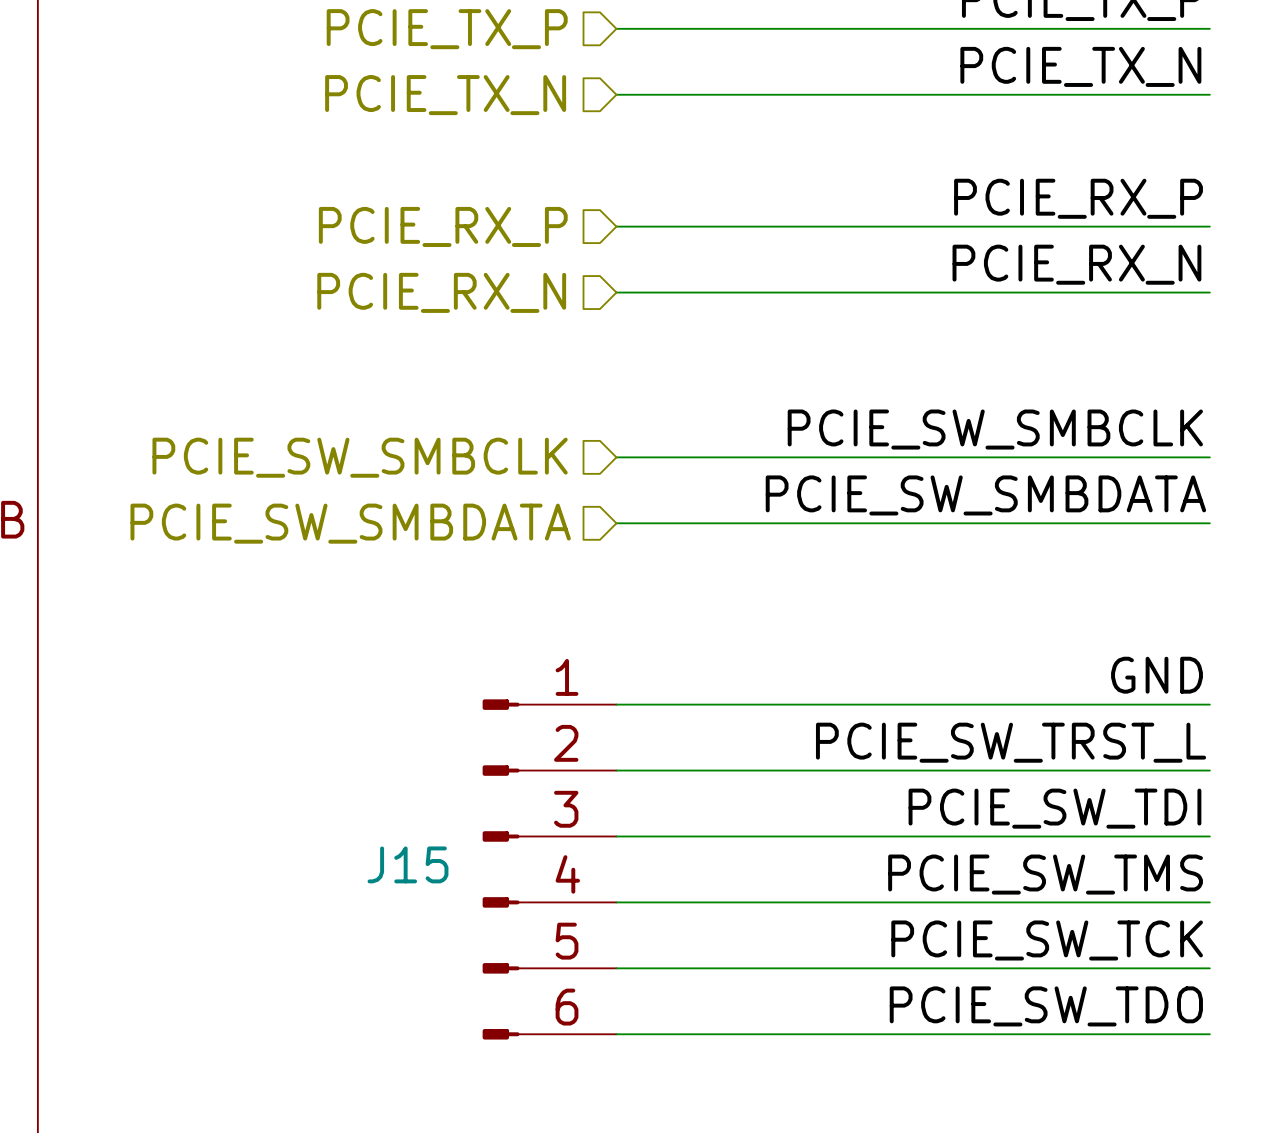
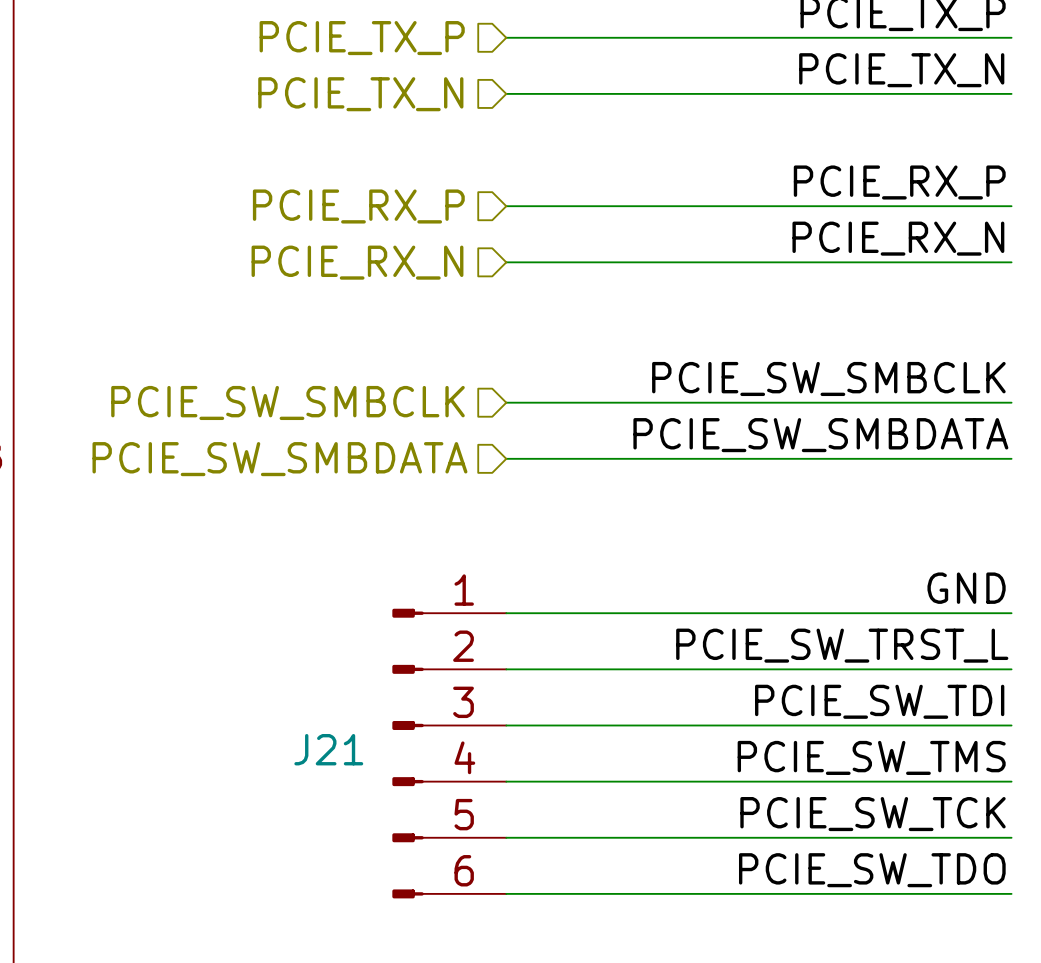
J15 name: J15 (408, 864) -> J21 (328, 749)

